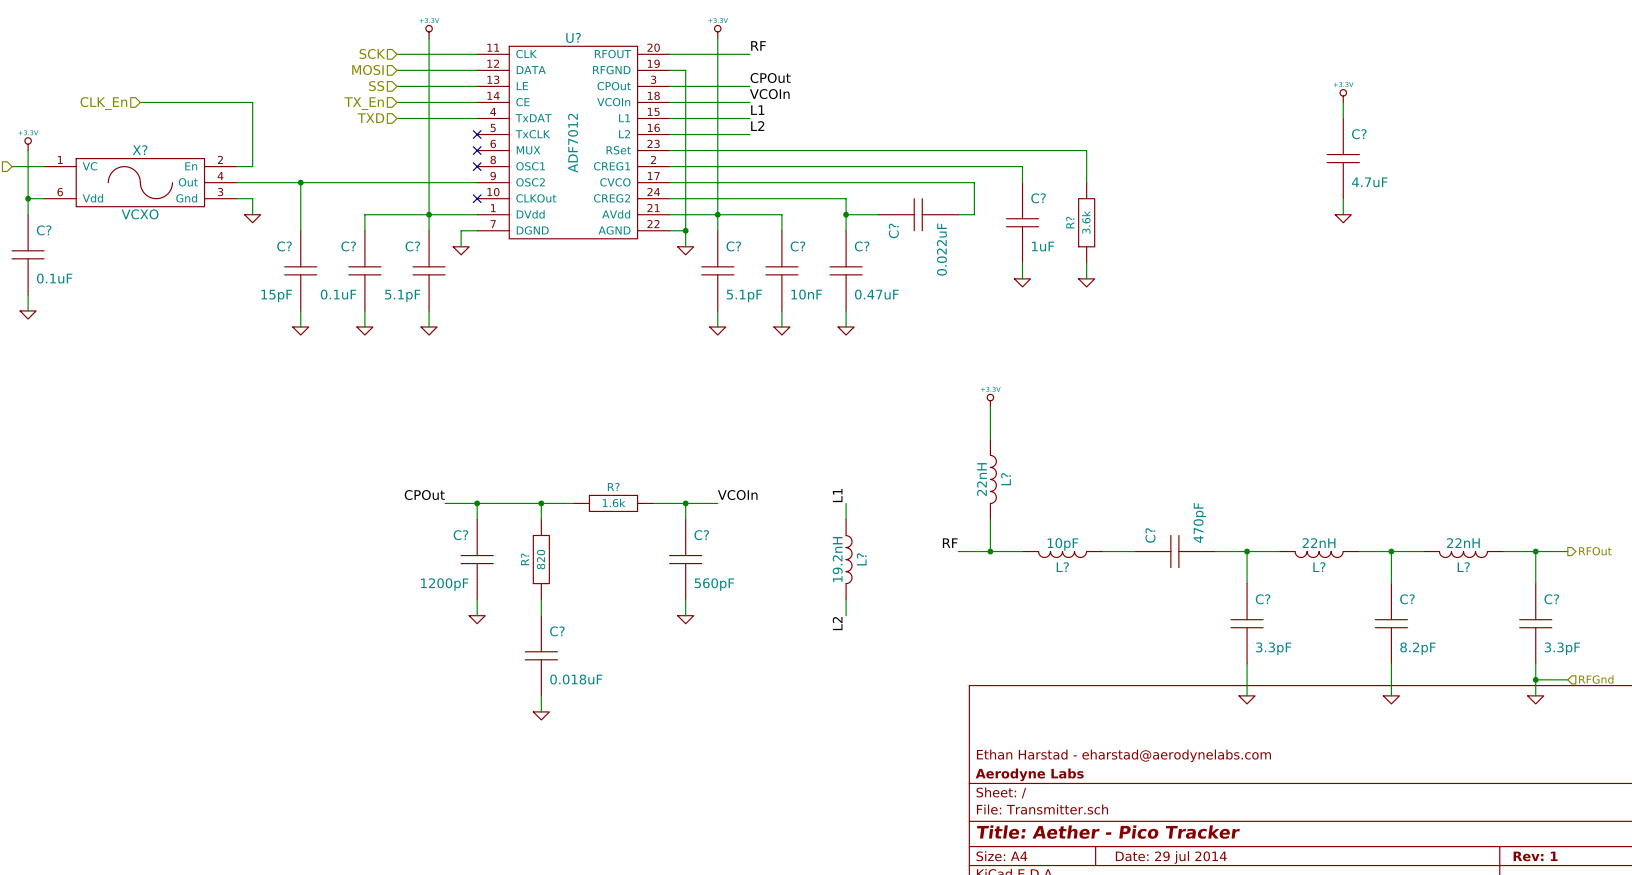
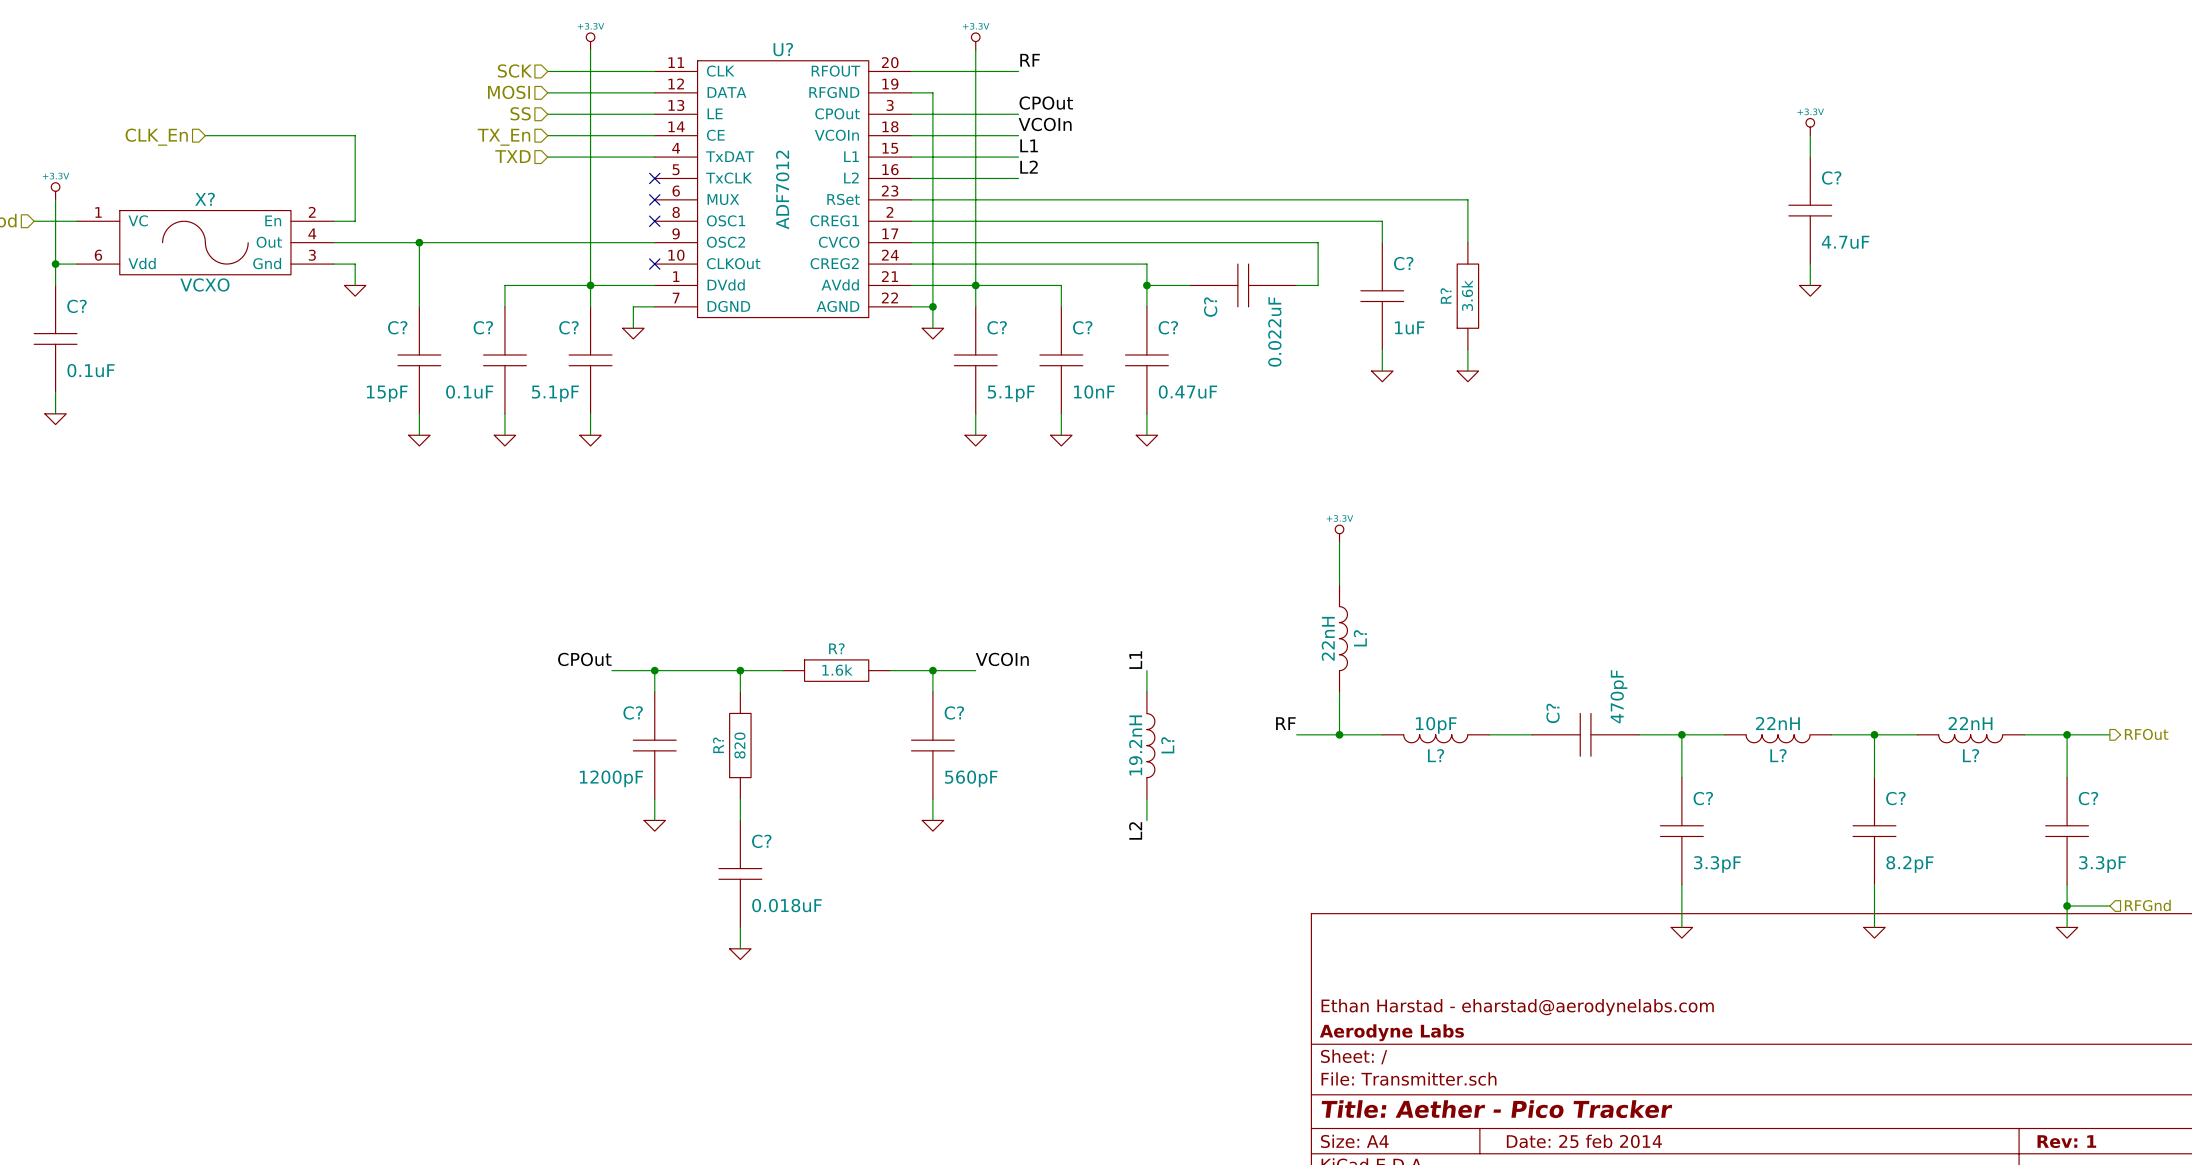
title block: Date: 29 jul 2014 (1171, 857) -> Date: 25 feb 2014 (1584, 1141)

